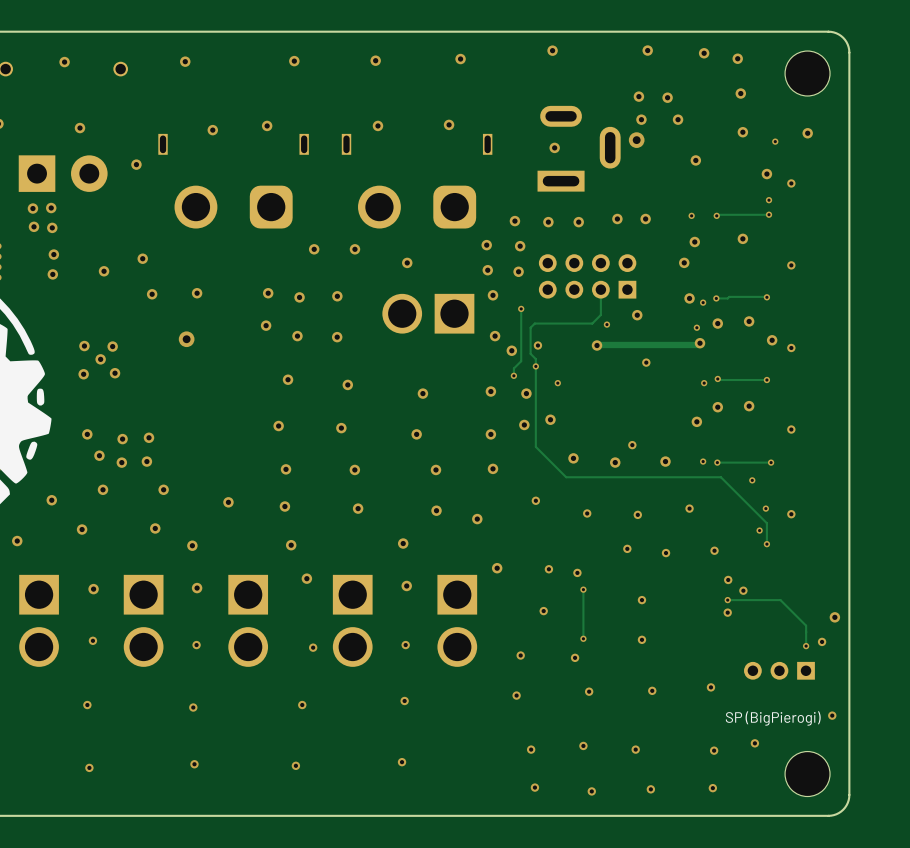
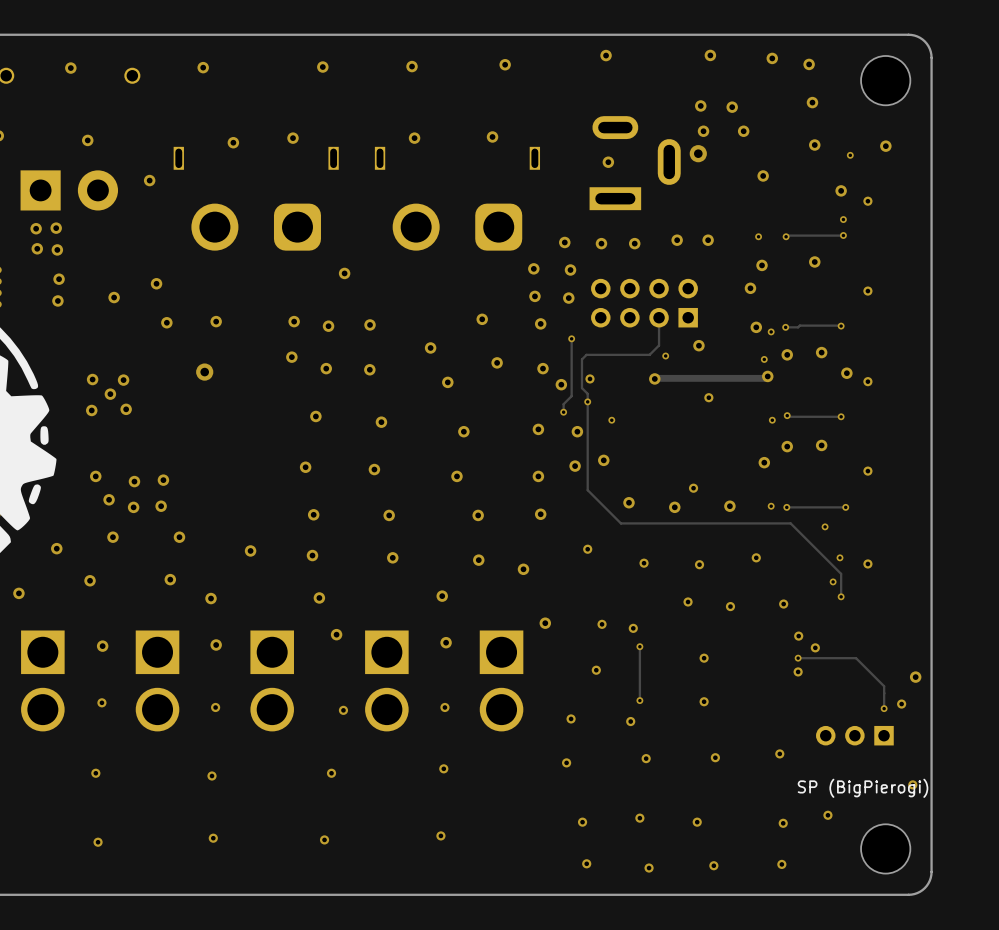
via: (354, 249) -> none
via: (407, 262) -> none
via: none -> (482, 319)
part: (428, 313) -> none
via: none -> (430, 347)
via: none -> (497, 362)
via: none -> (447, 382)

